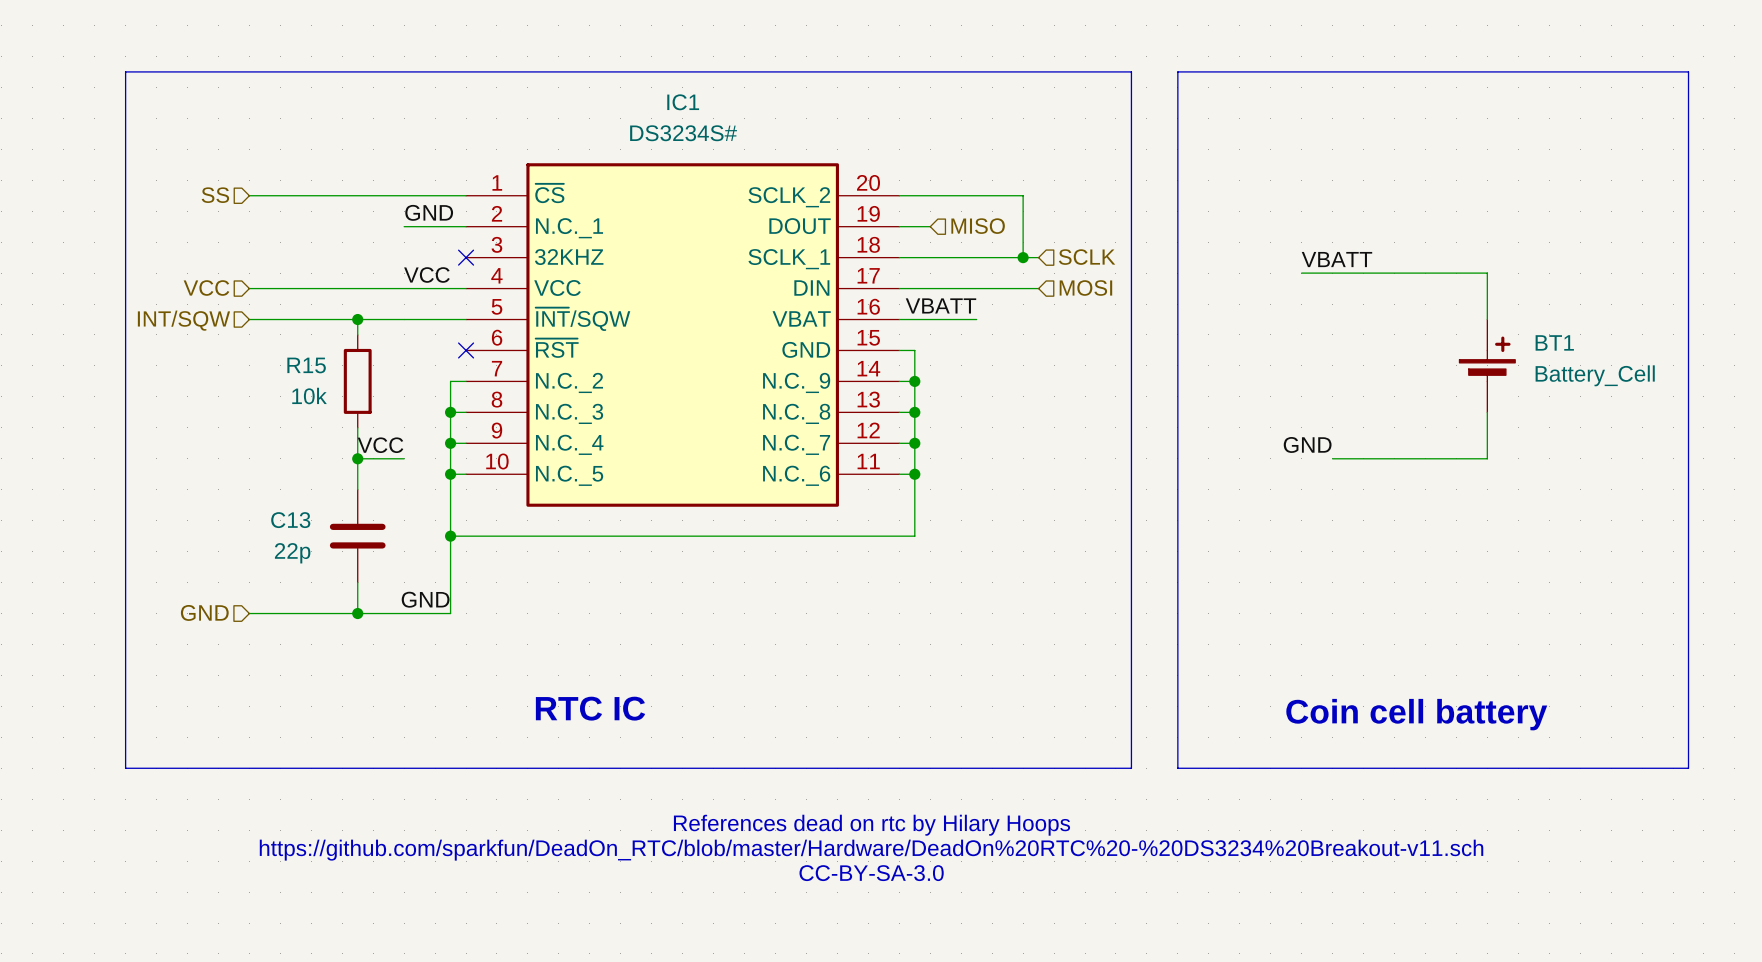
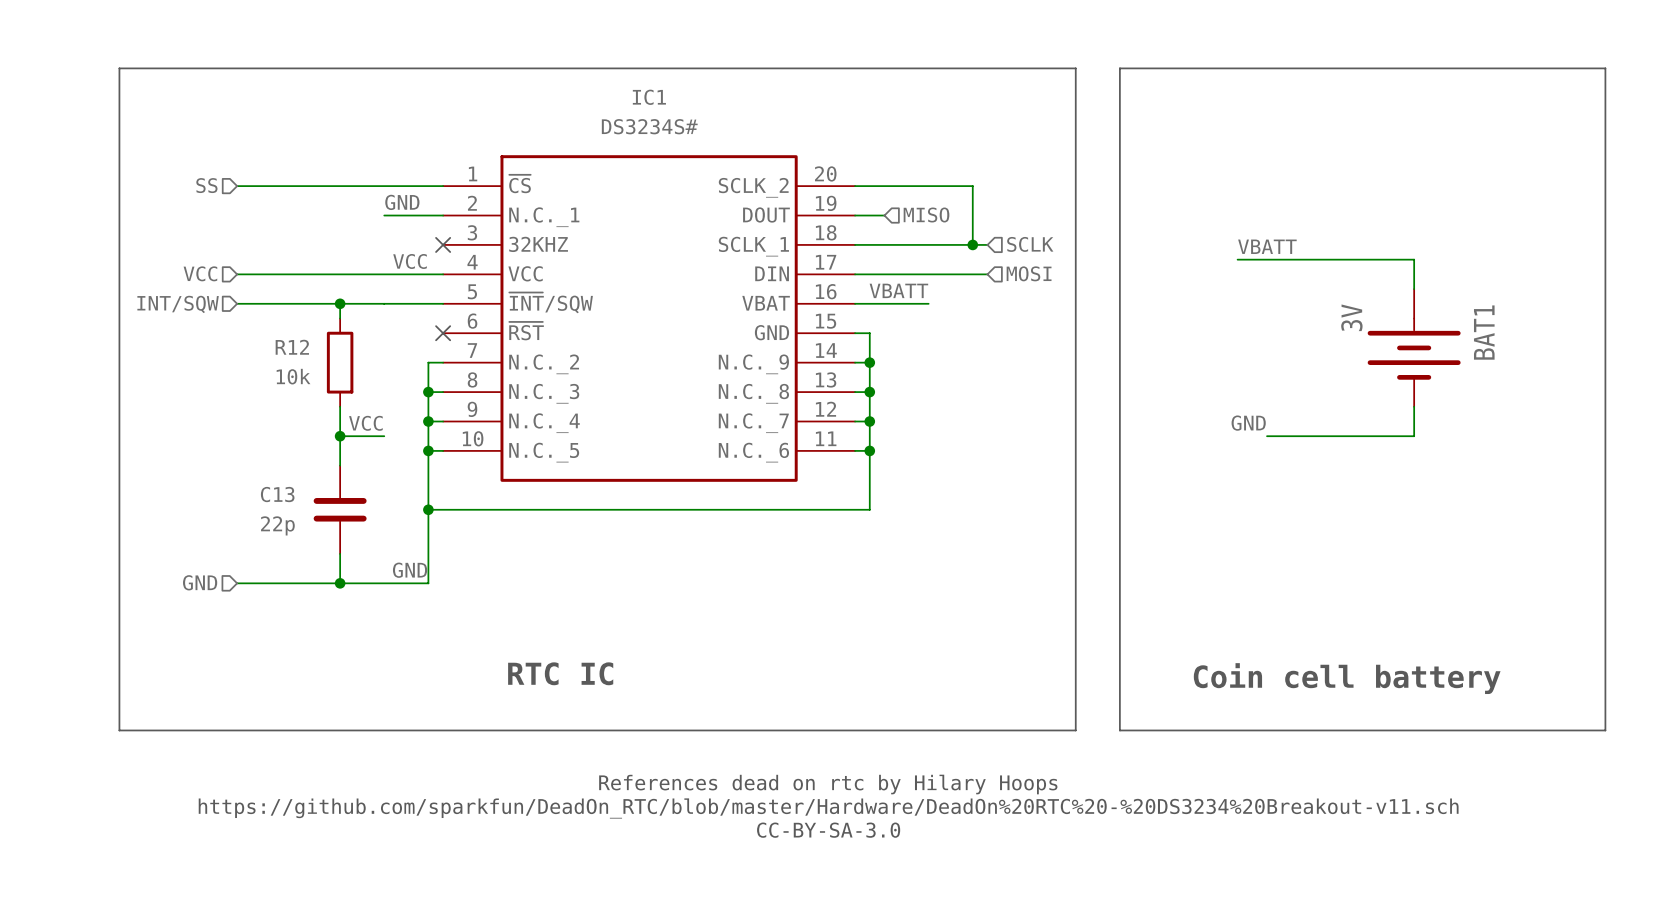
R15 name: R15 (306, 365) -> R12 (292, 347)
BT1: Battery_Cell (1487, 365) -> none
BAT1: none -> 3V (1414, 347)

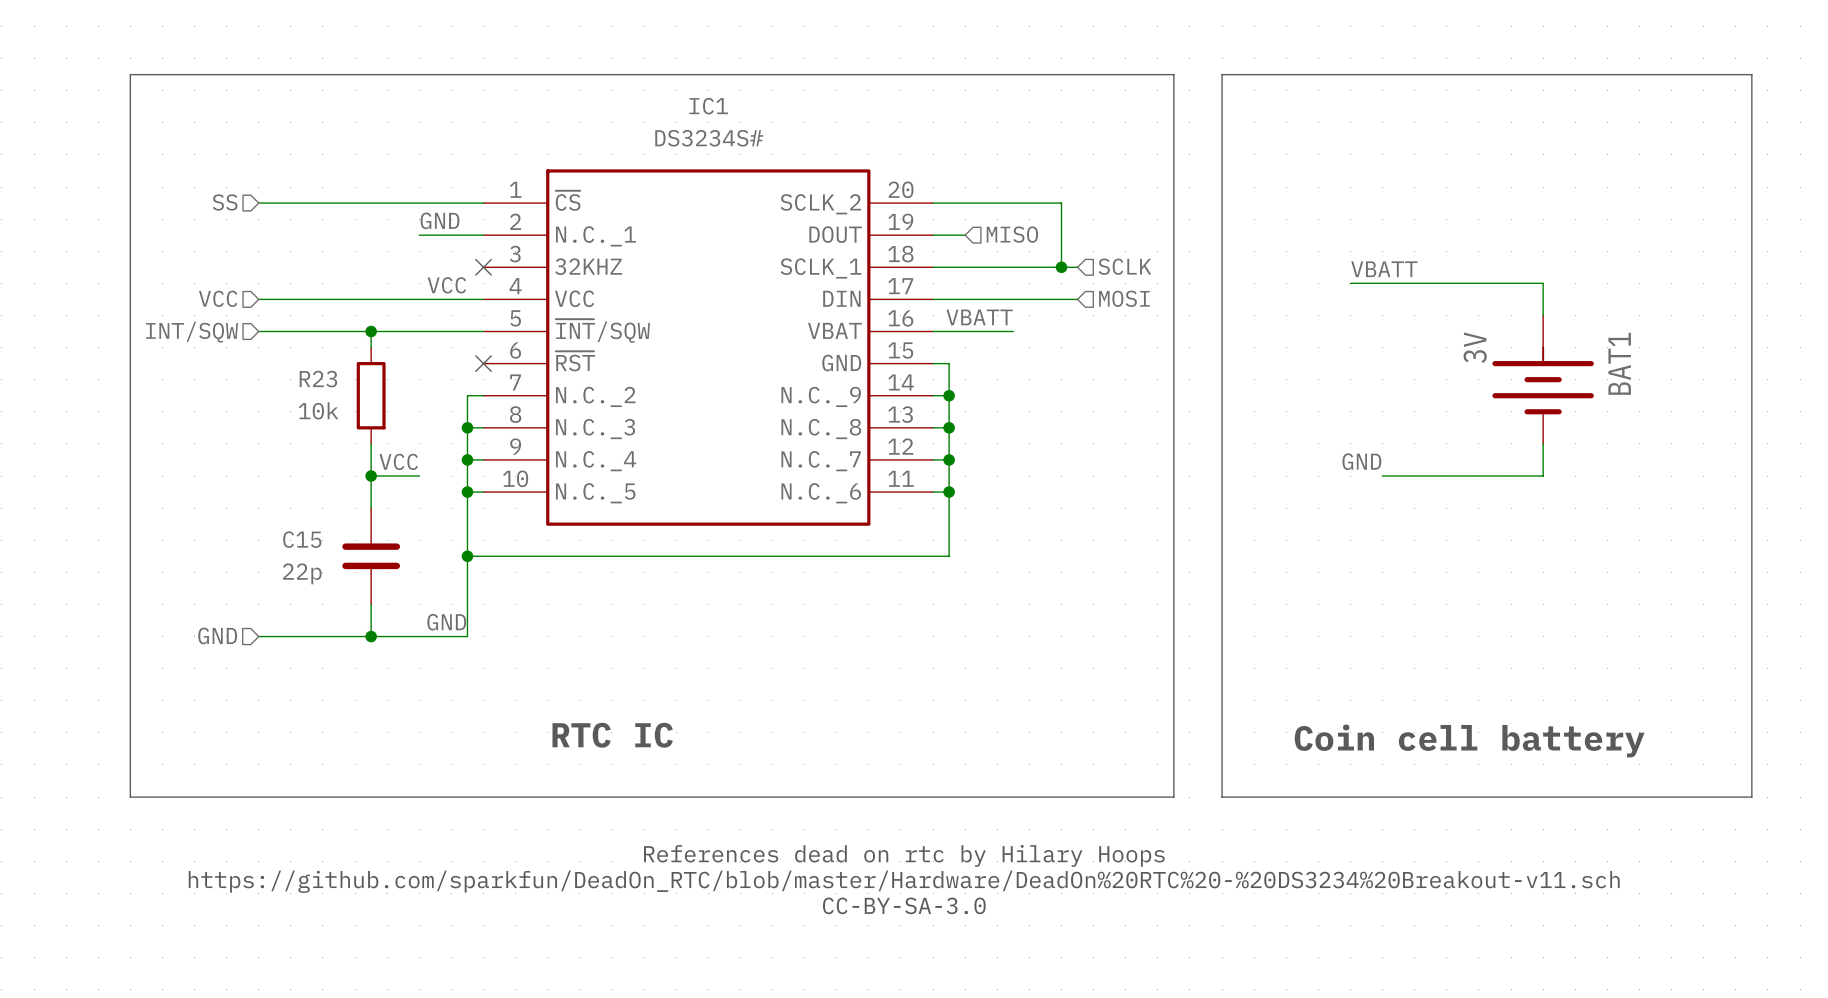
R12 name: R12 (292, 347) -> R23 (318, 379)
C13 name: C13 (277, 494) -> C15 (302, 539)

